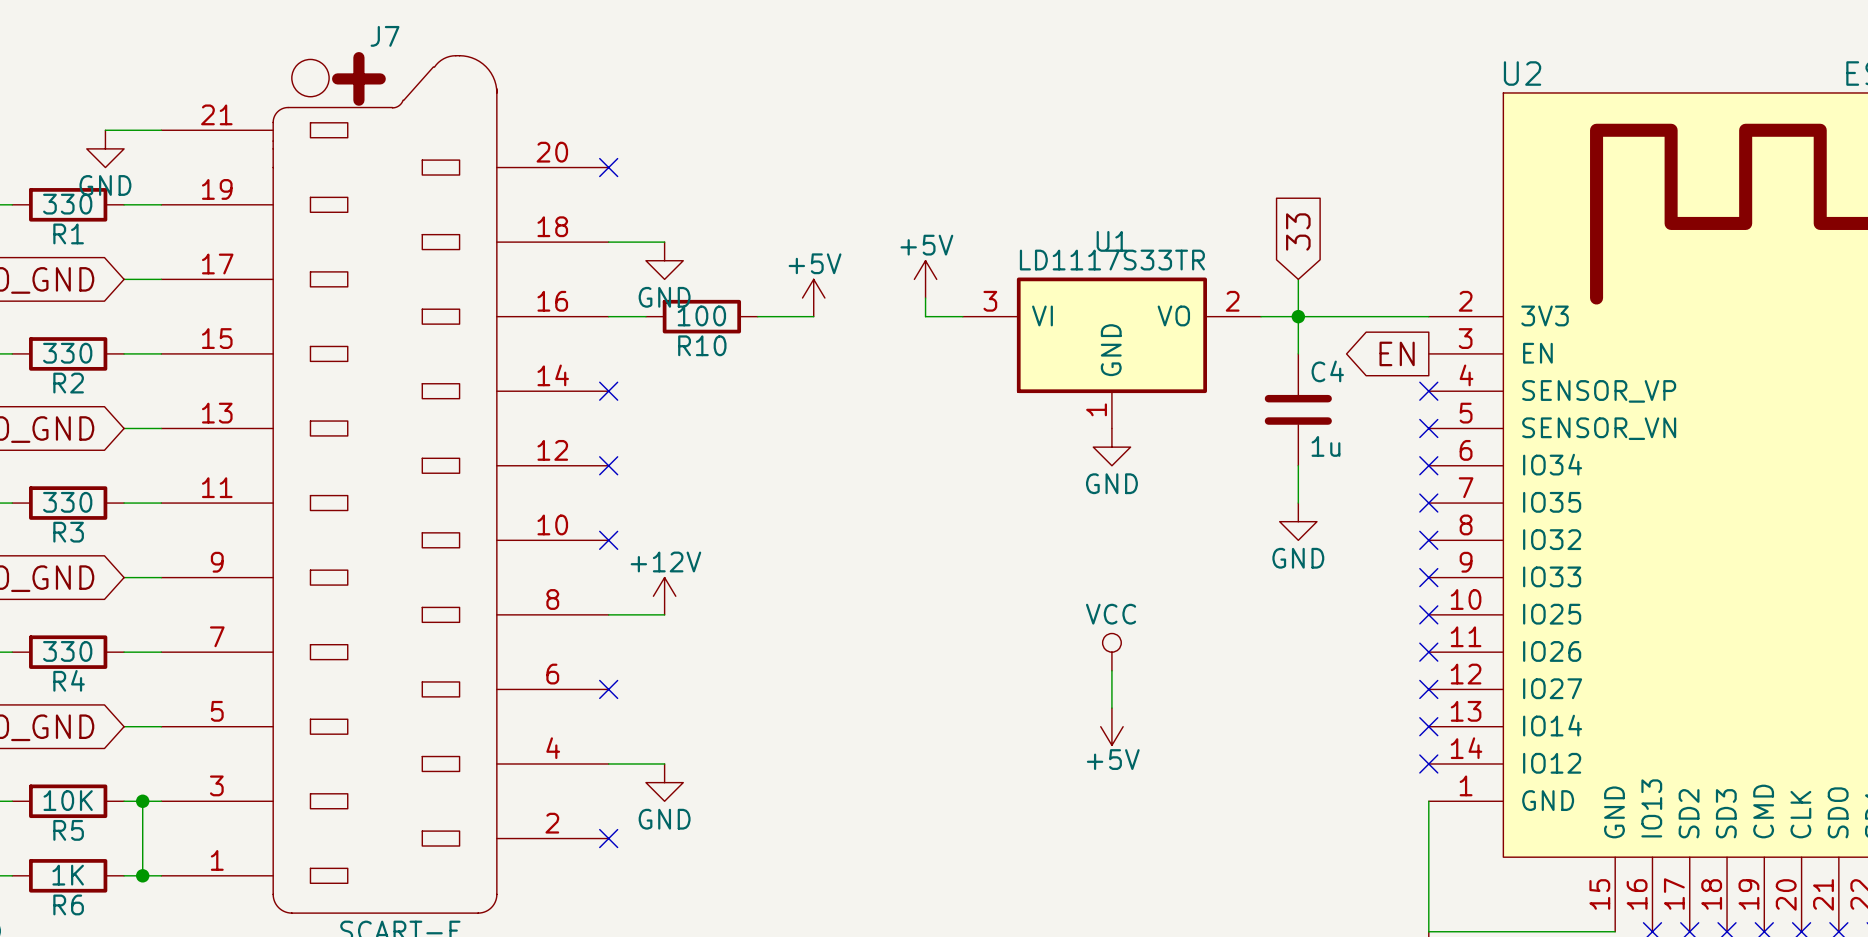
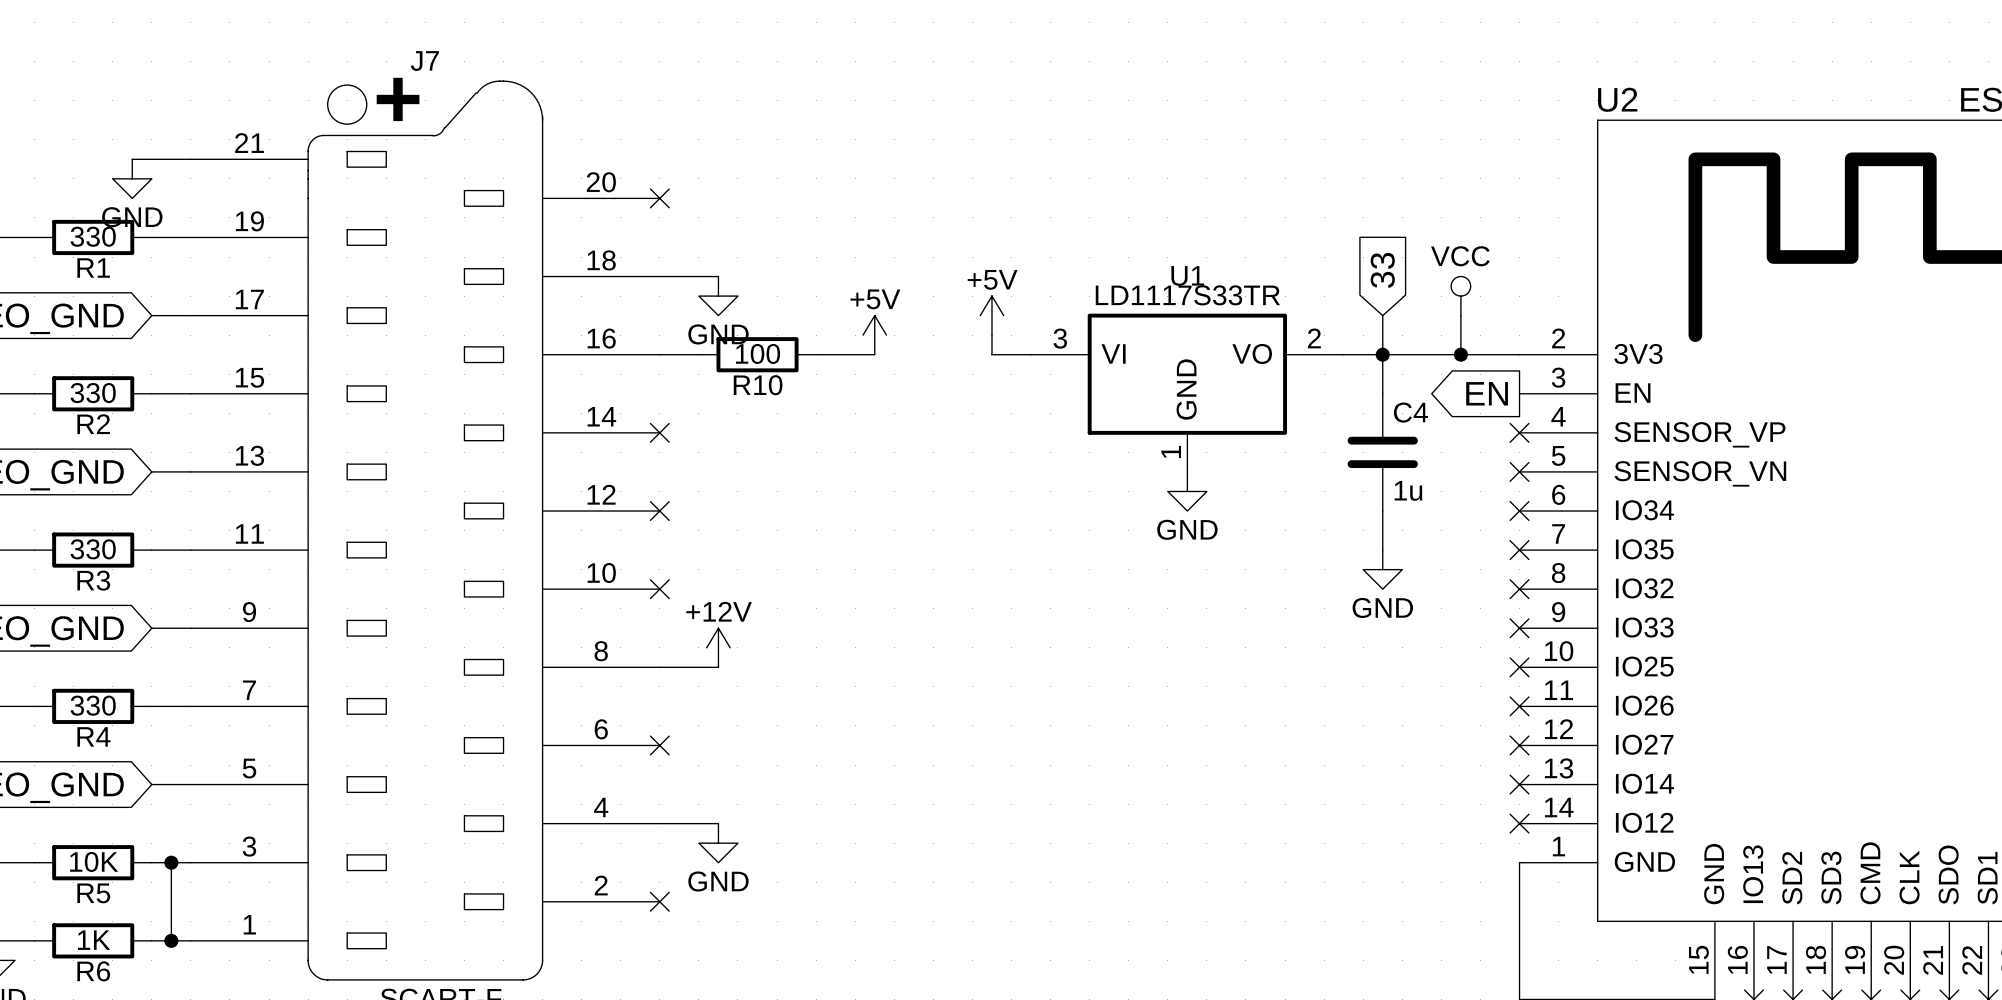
power symbol: none -> VCC (1460, 296)
wire: none -> (1460, 315) (1460, 354)
junction: none -> (1460, 354)
power symbol: VCC (1111, 652) -> none
wire: (1111, 670) (1111, 708) -> none
power symbol: +5V (1111, 726) -> none

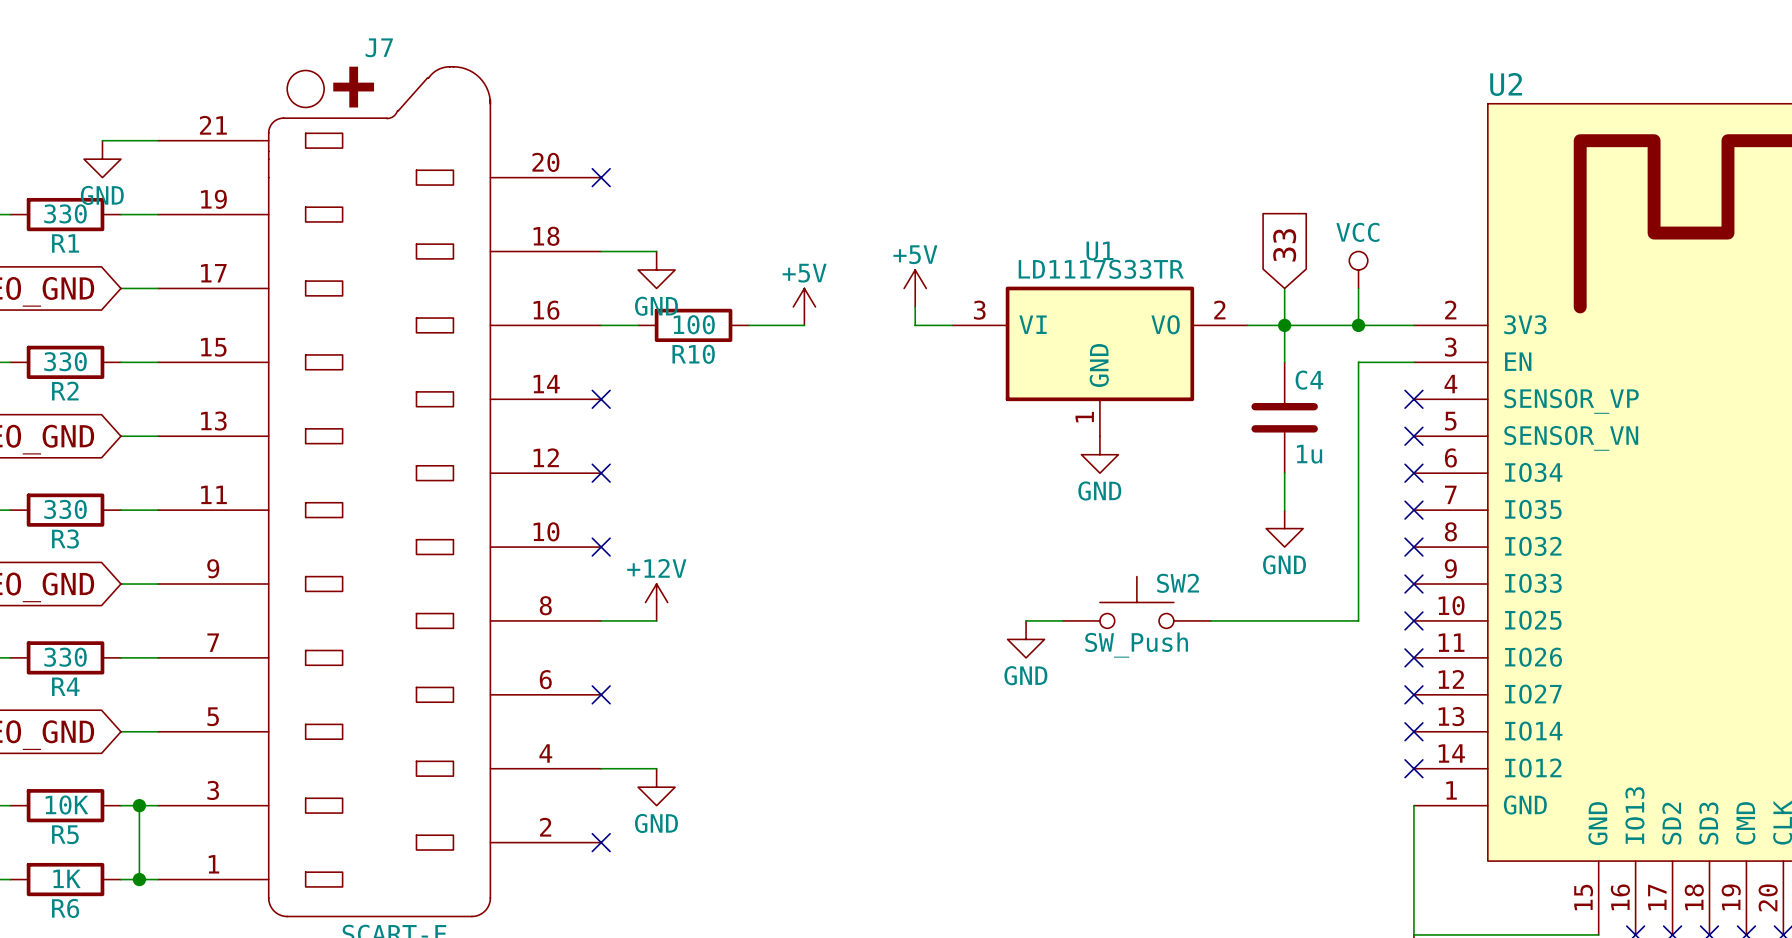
global label: EN (1487, 393) -> none
wire: none -> (1413, 362) (1358, 362) (1358, 620) (1210, 620)
SW2: none -> SW_Push (1136, 602)
wire: none -> (1026, 620) (1062, 620)
power symbol: none -> GND (1026, 639)

